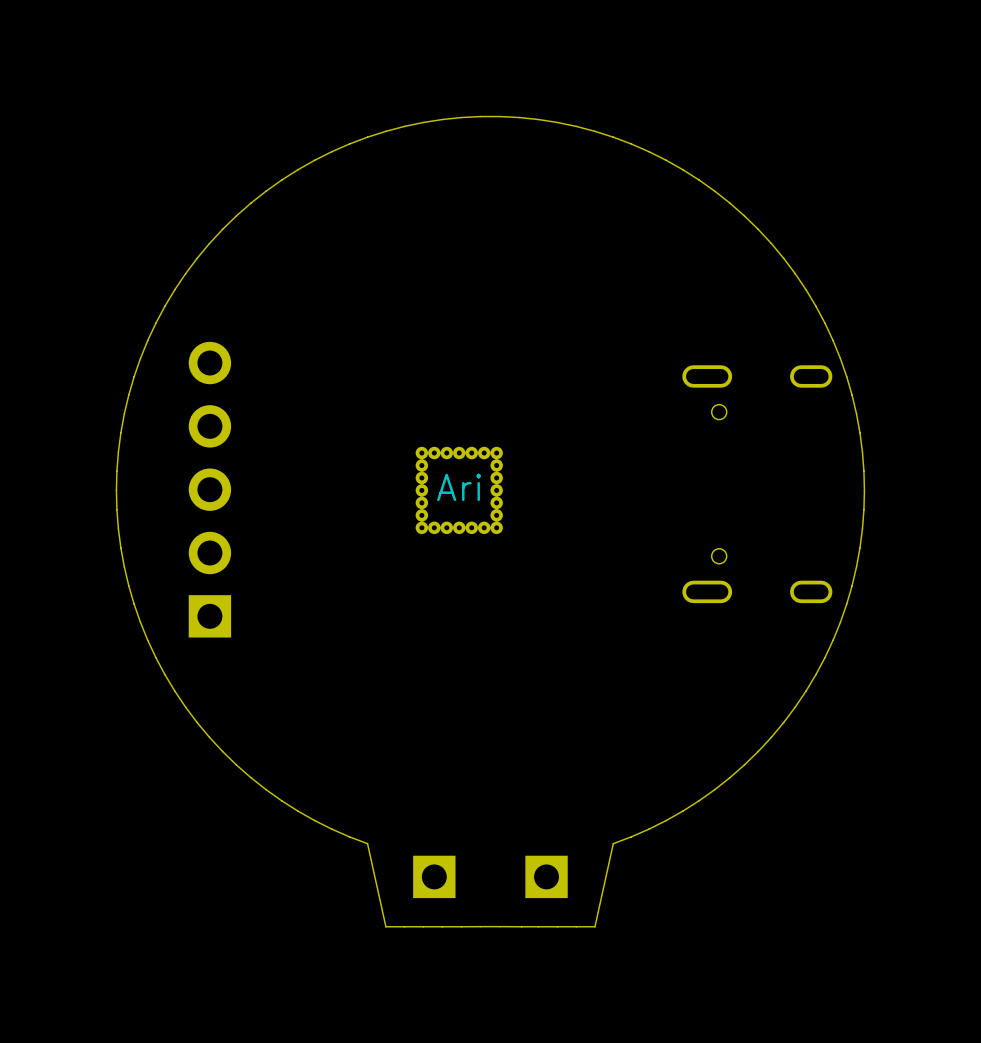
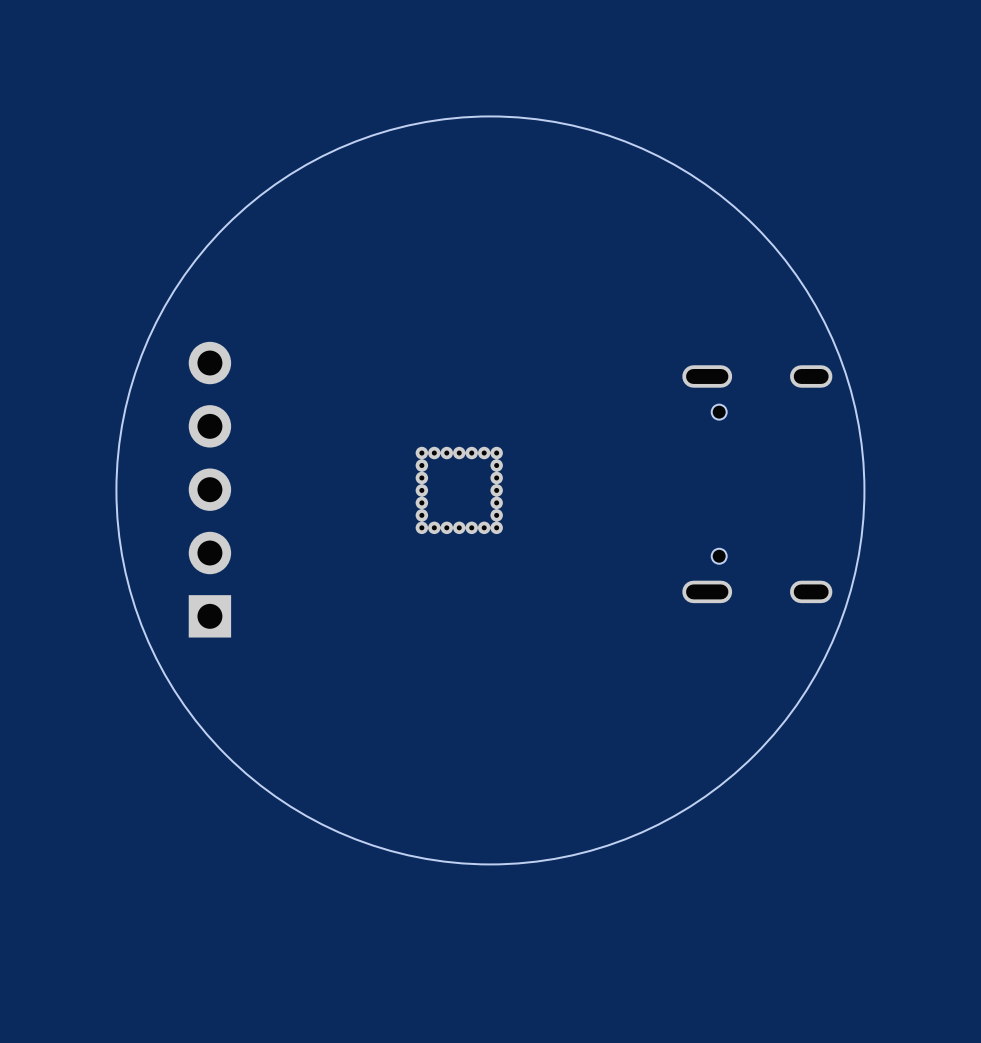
round board edge: none -> [115, 115, 866, 866]
board edge: (500, 116) (442, 119) (404, 126) (367, 137) (314, 160) (281, 180) (250, 203) (209, 243) (185, 273) (164, 306) (147, 340) (134, 376) (120, 432) (116, 490) (118, 528) (124, 566) (140, 622) (164, 674) (185, 707) (209, 737) (250, 777) (281, 800) (314, 820) (367, 843) (385, 926) (594, 926) (613, 843) (666, 820) (714, 789) (758, 751) (795, 707) (815, 674) (833, 640) (852, 585) (859, 547) (863, 509) (863, 471) (859, 432) (852, 395) (833, 340) (815, 306) (795, 273) (771, 243) (744, 215) (714, 191) (682, 169) (648, 151) (613, 137) (576, 126) (538, 119) (500, 116) -> none
text: Ari (459, 487) -> none
part: (434, 876) -> none
part: (546, 876) -> none

